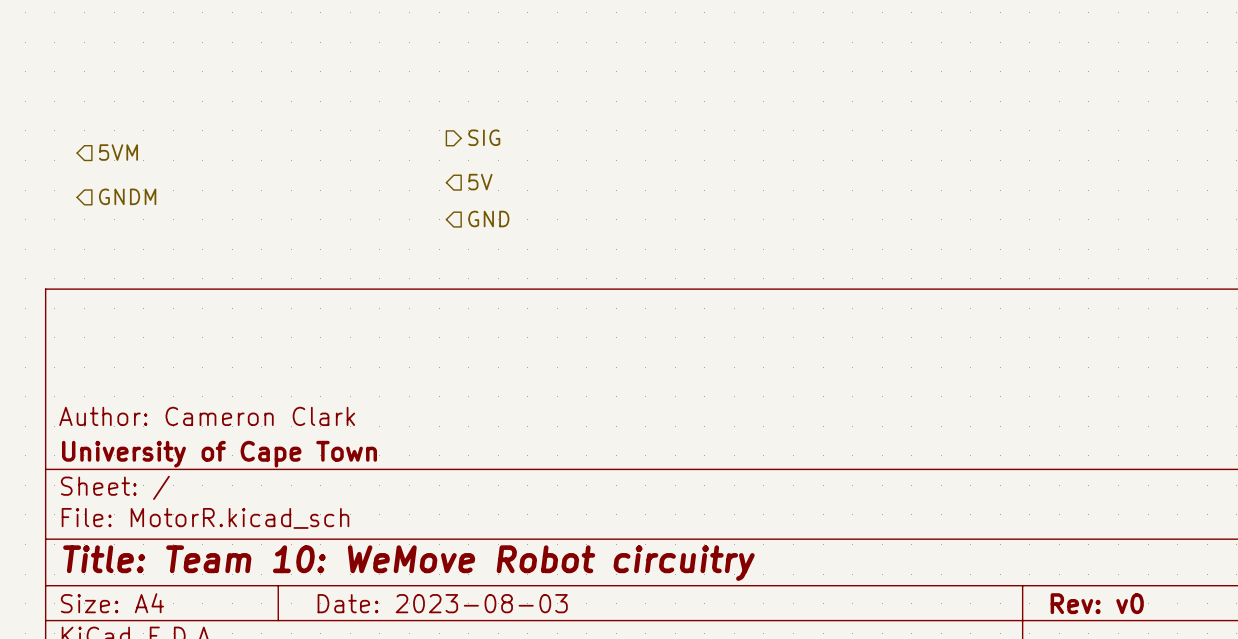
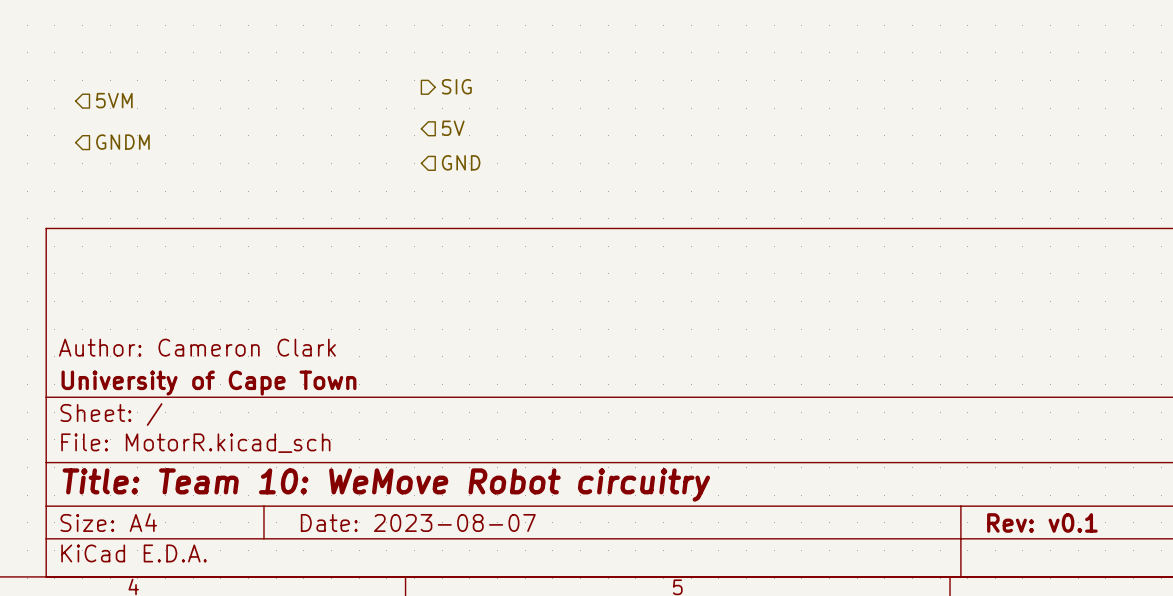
title block: Date: 2023-08-03 (442, 603) -> Date: 2023-08-07 (418, 522)
title block: Rev: v0 (1097, 603) -> Rev: v0.1 (1042, 522)

